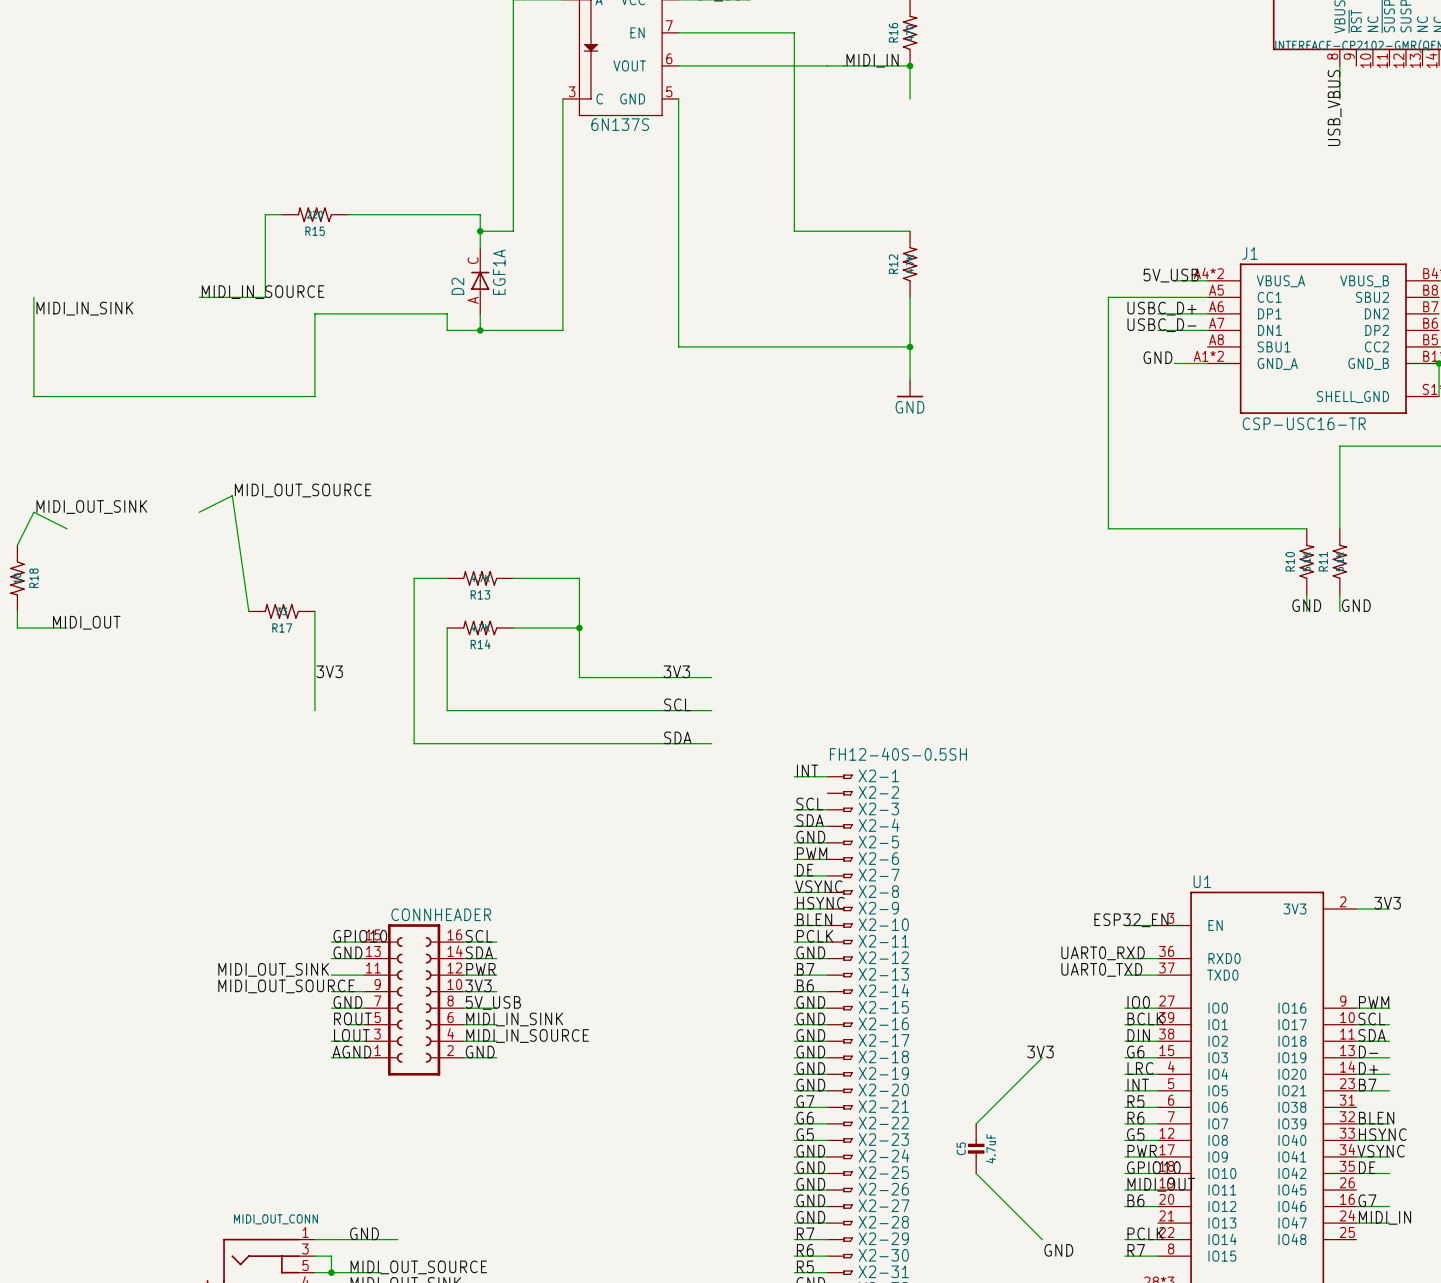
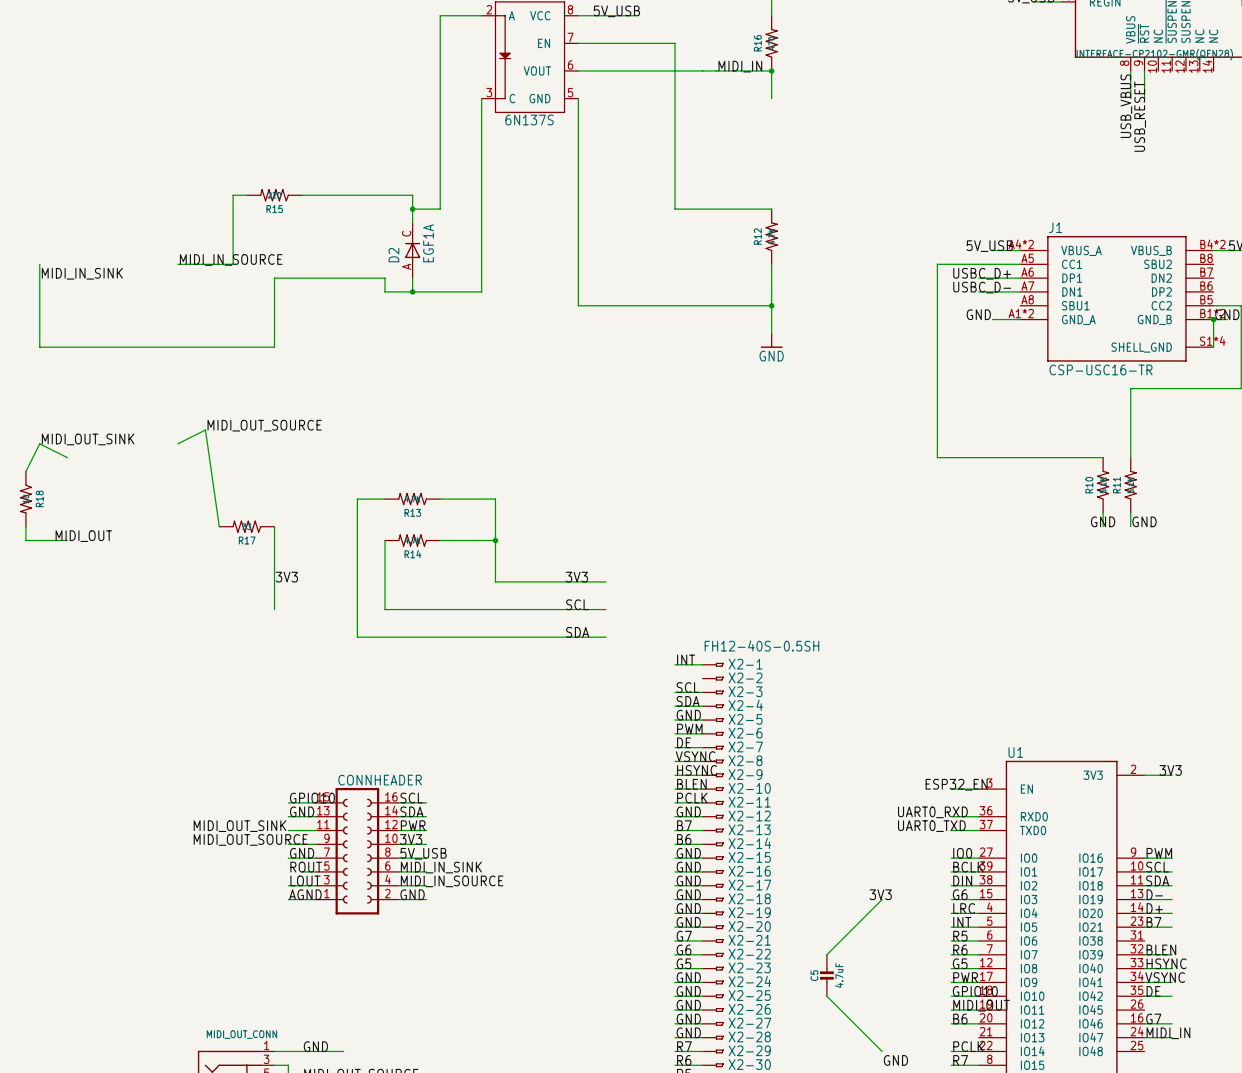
wire: none -> (1144, 70) (1144, 98)
label: none -> USB_RESET (1140, 116)

